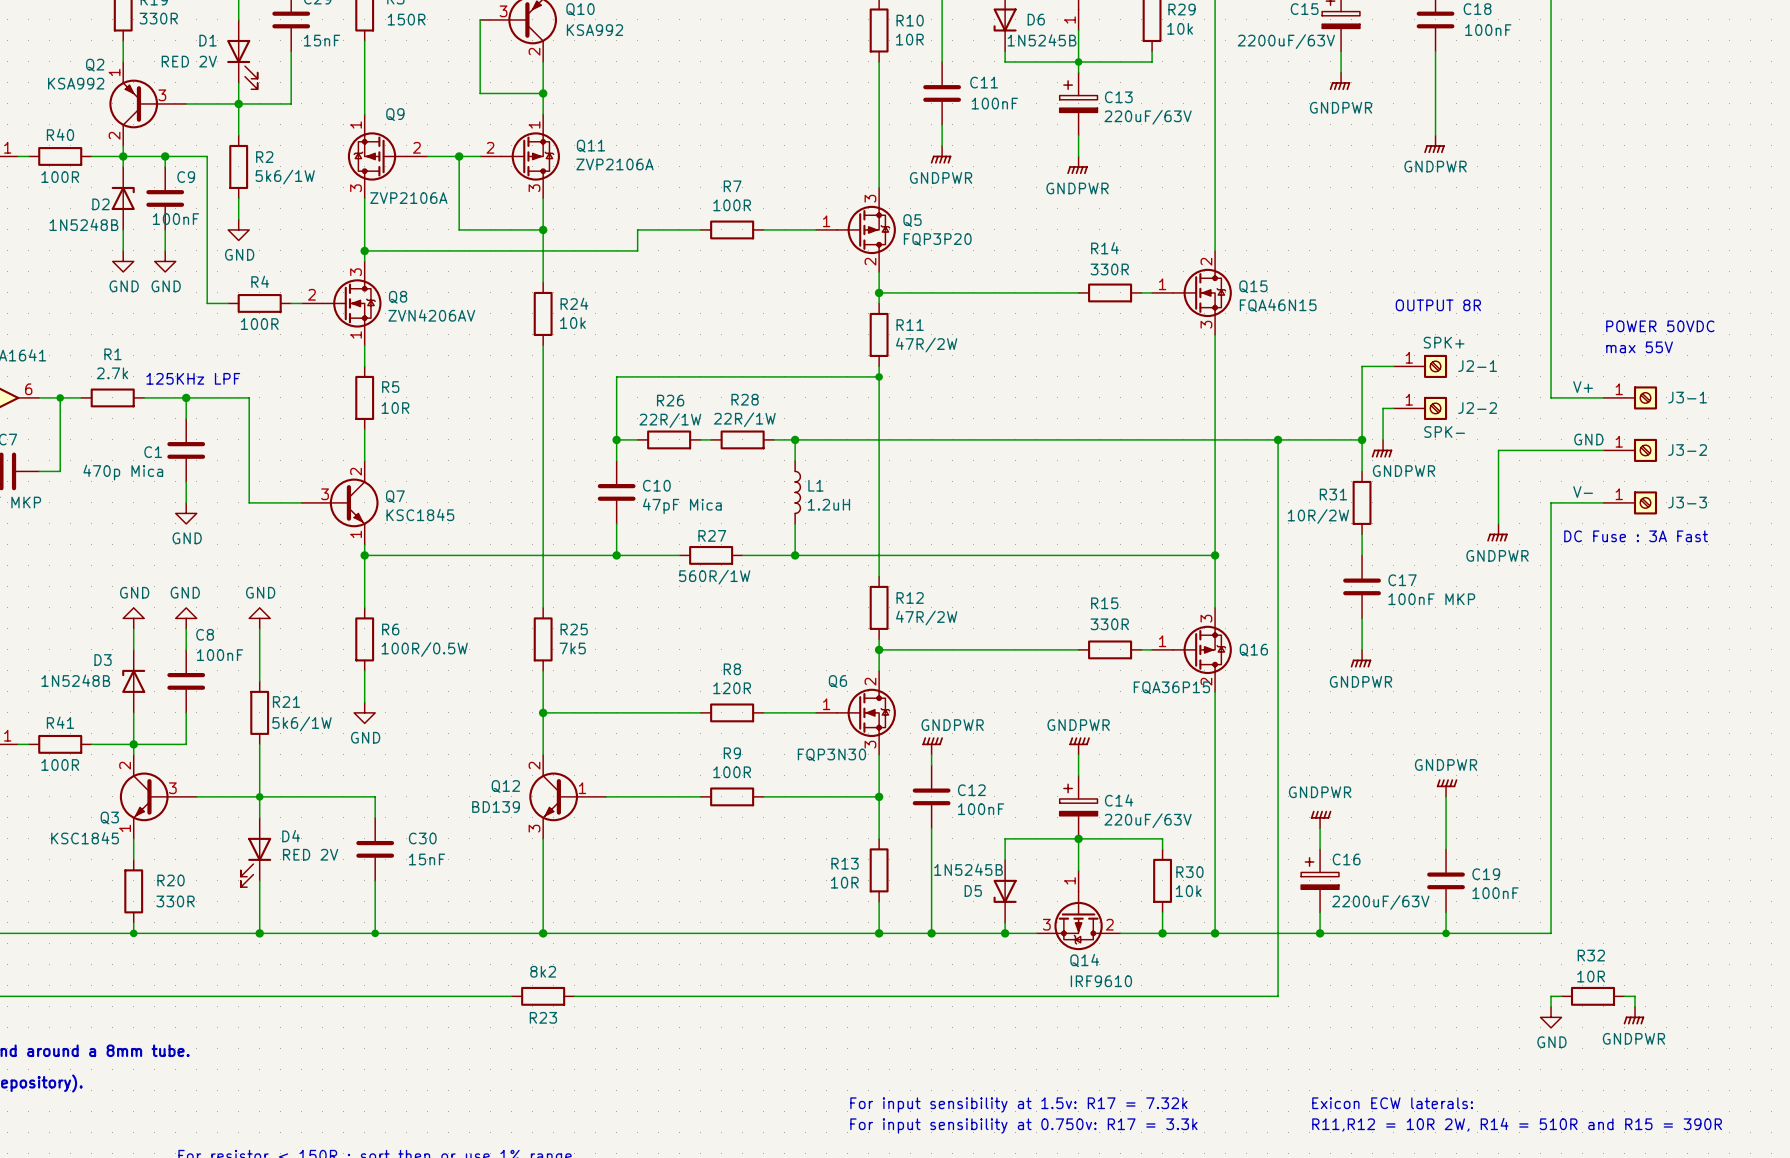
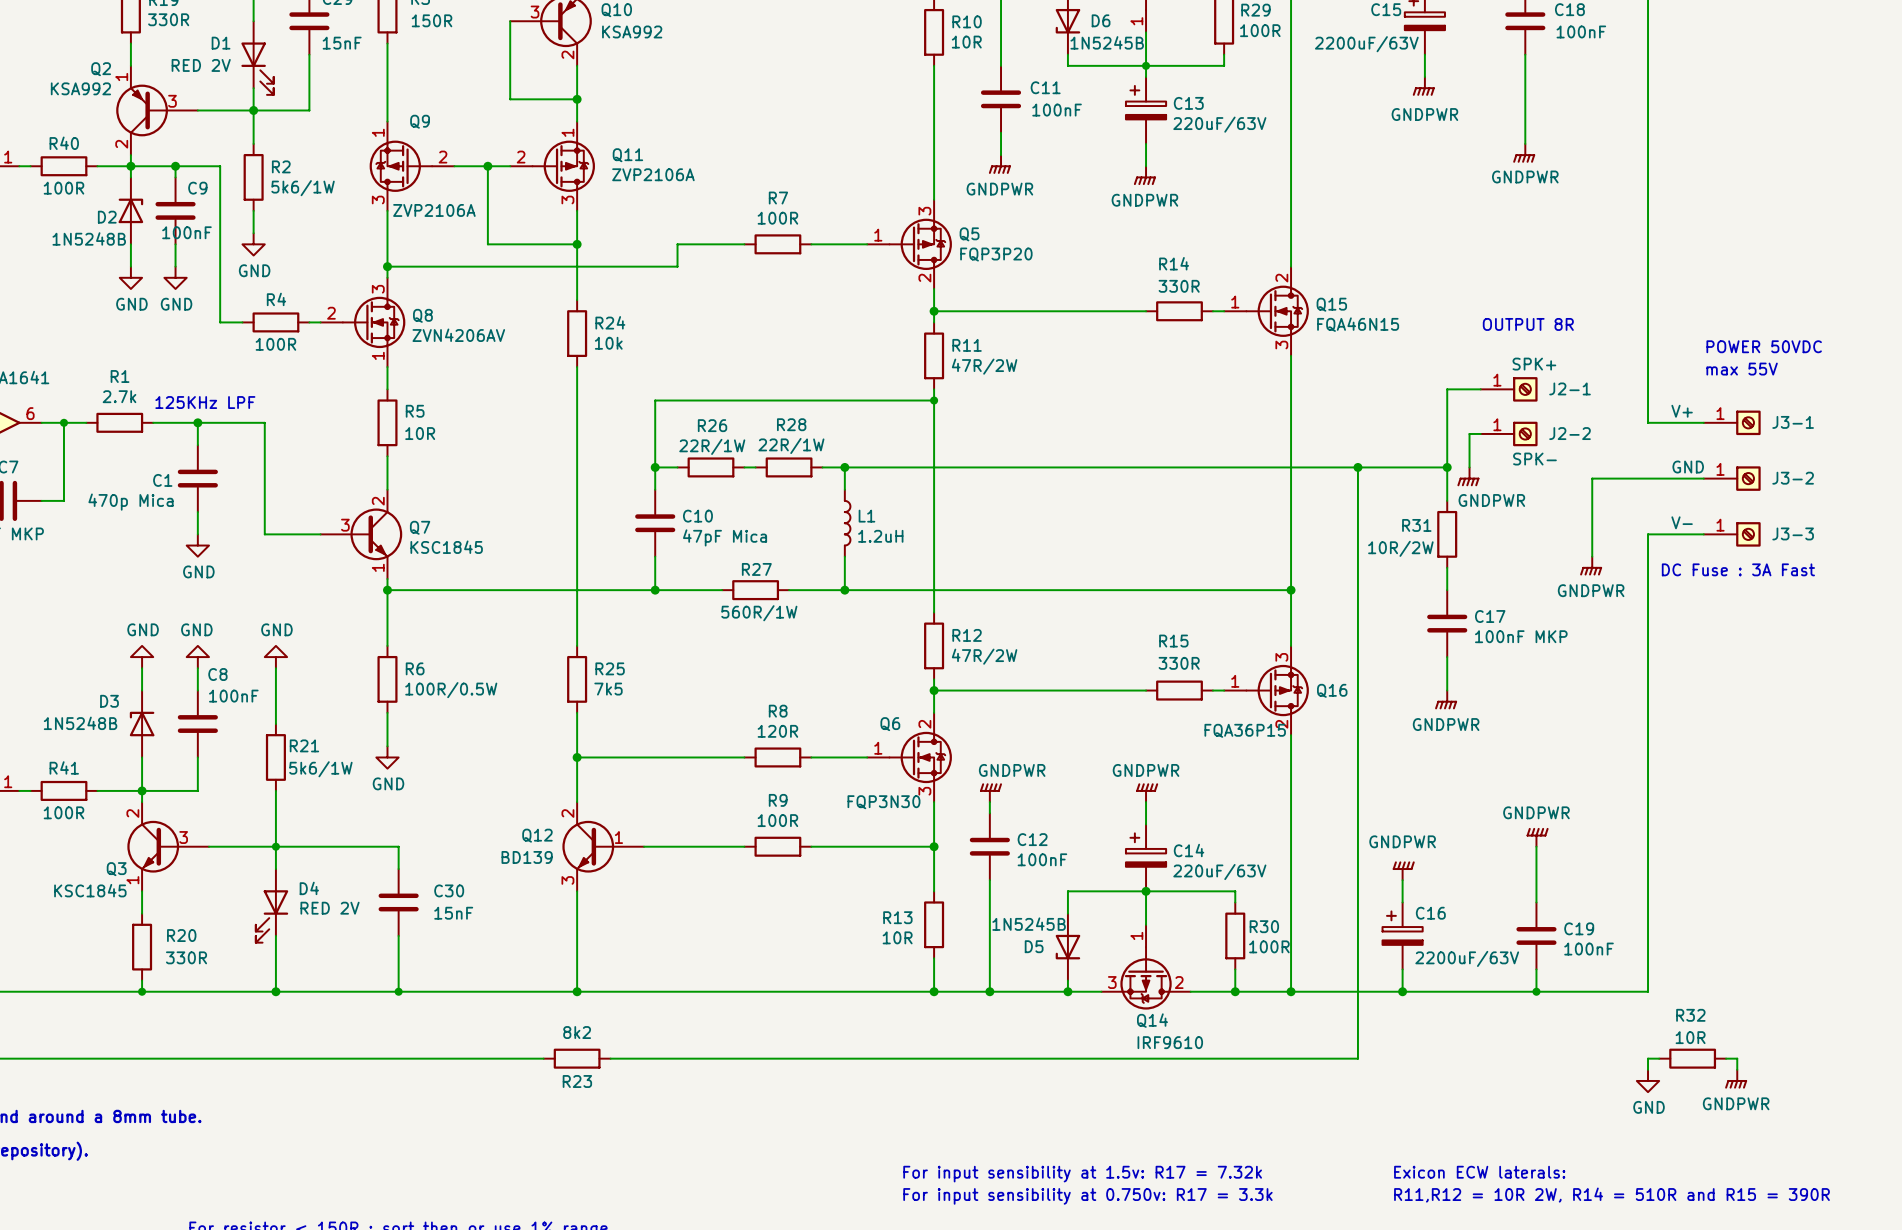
R29 value: 10k (1180, 28) -> 100R (1260, 30)
R30 value: 10k (1188, 891) -> 100R (1269, 946)

